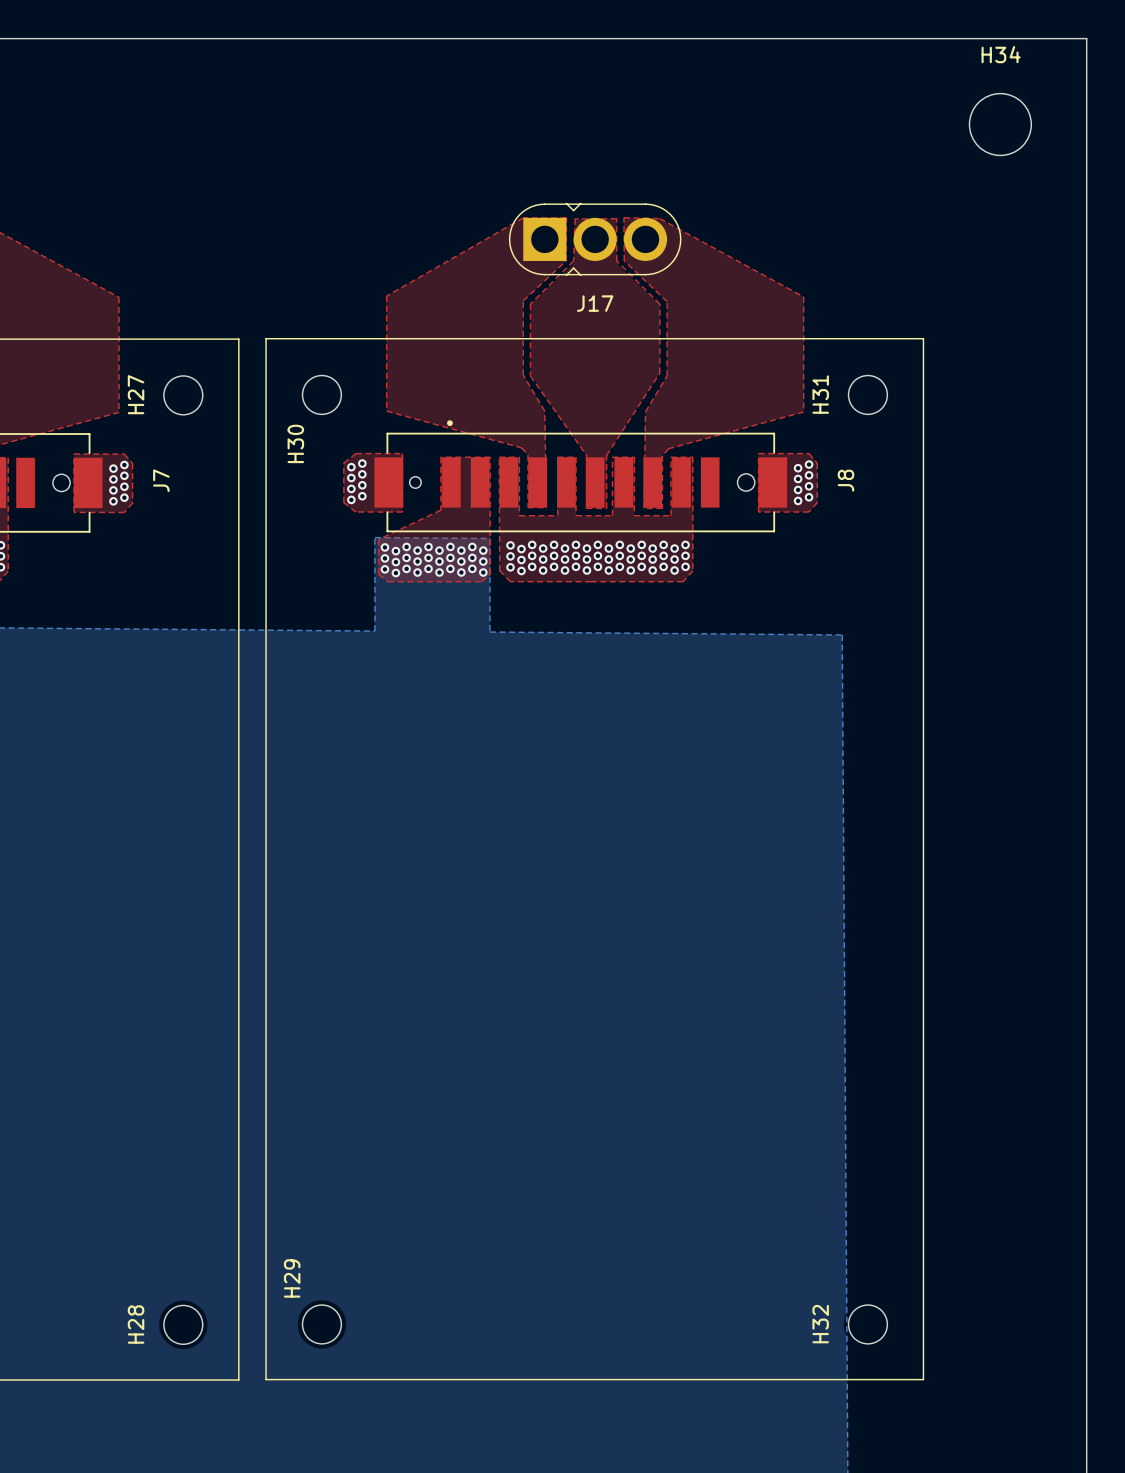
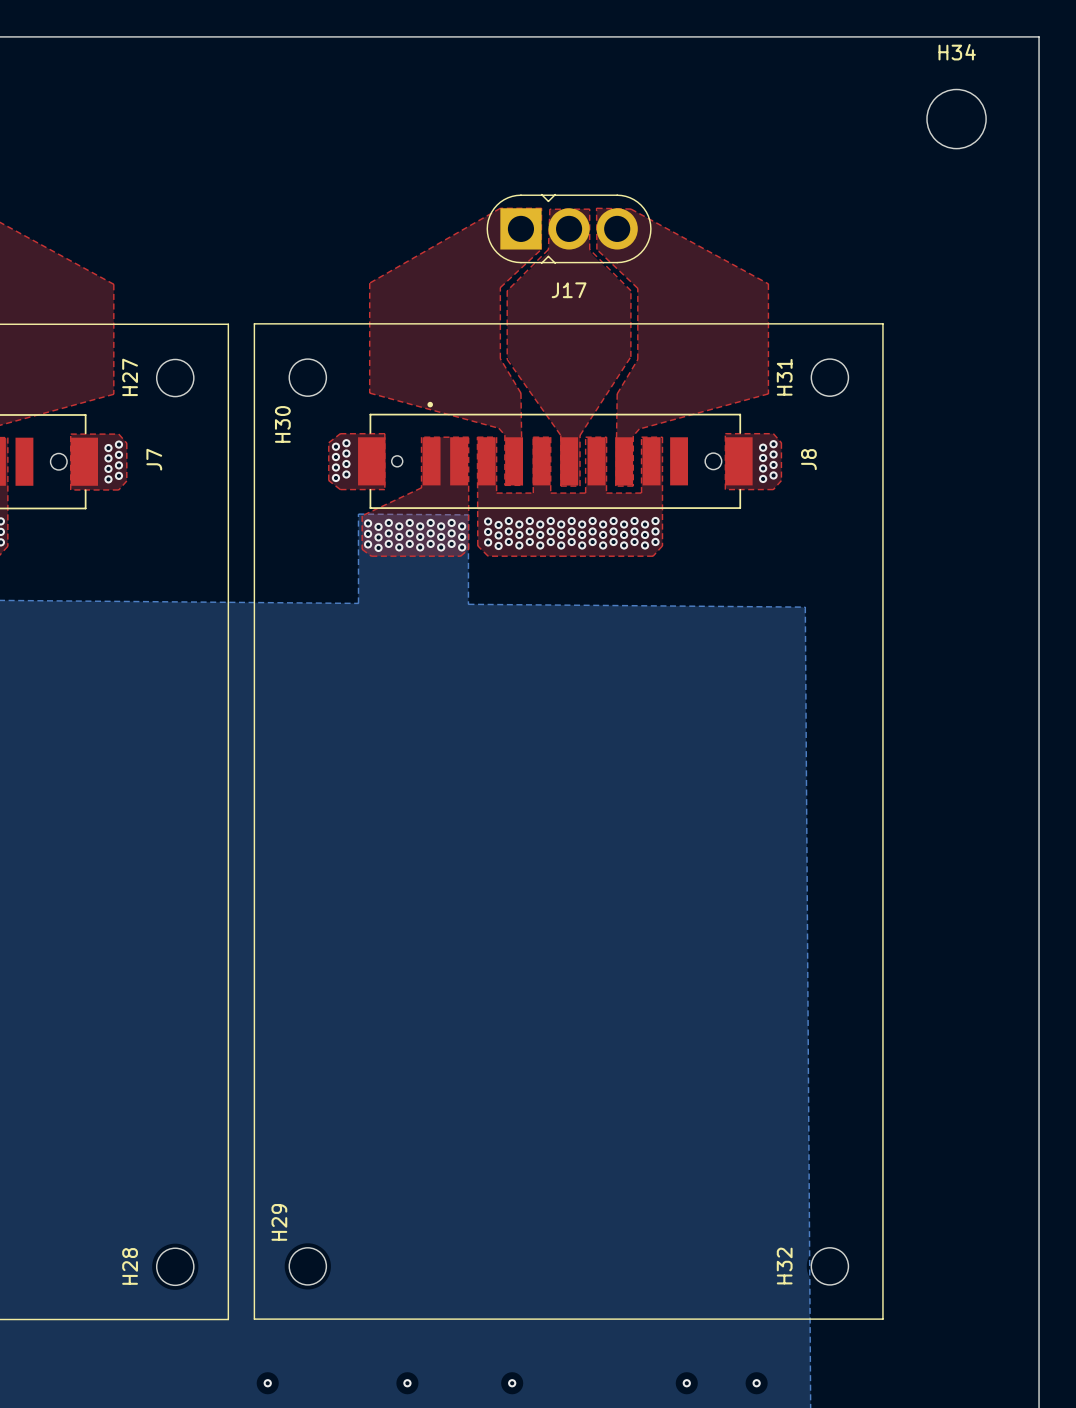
via: none -> (267, 1383)
via: none -> (407, 1383)
via: none -> (512, 1383)
via: none -> (686, 1383)
via: none -> (756, 1383)

